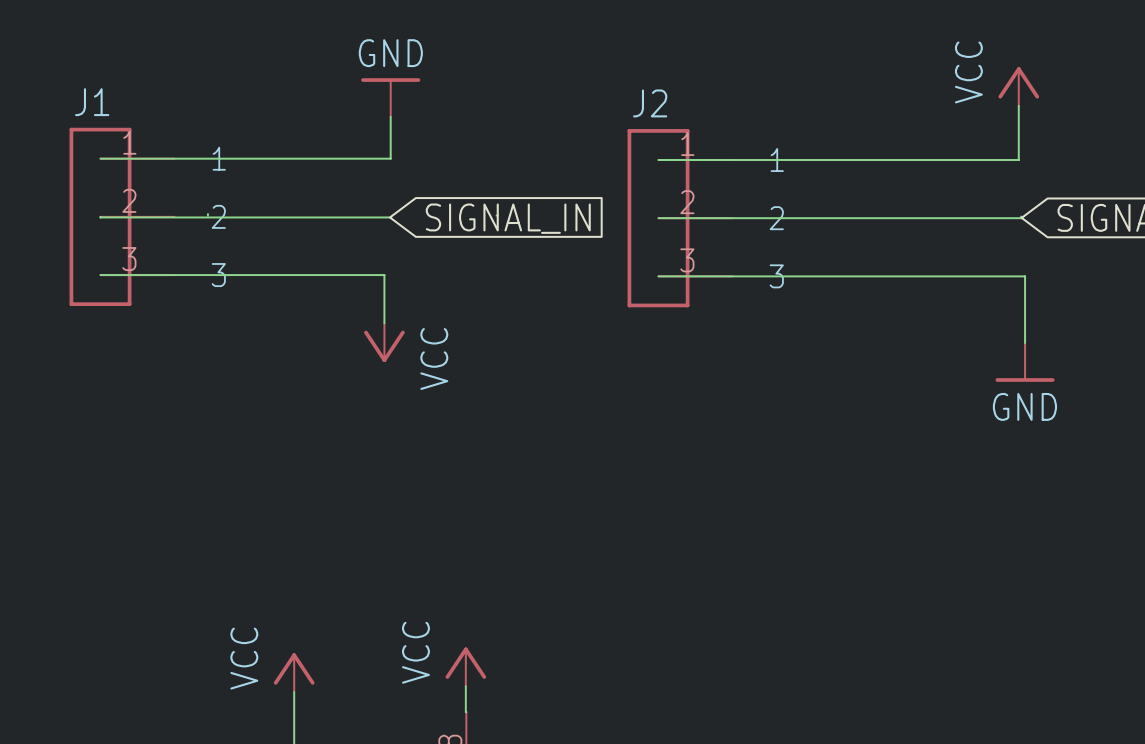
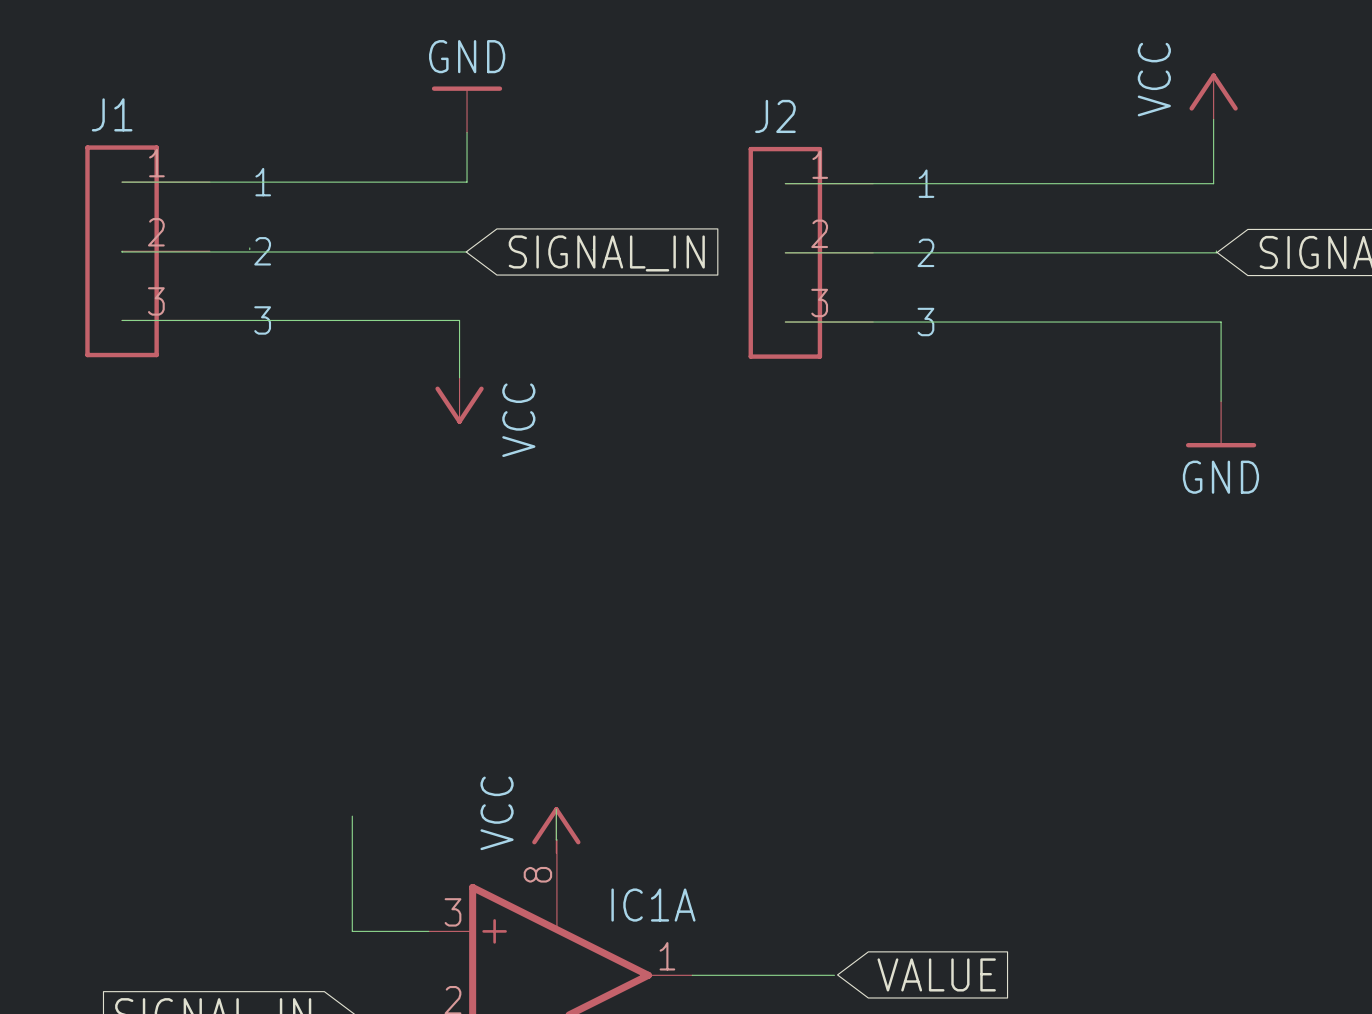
power symbol position: VCC (465, 666) -> VCC (556, 830)
power symbol: VCC (294, 672) -> none

